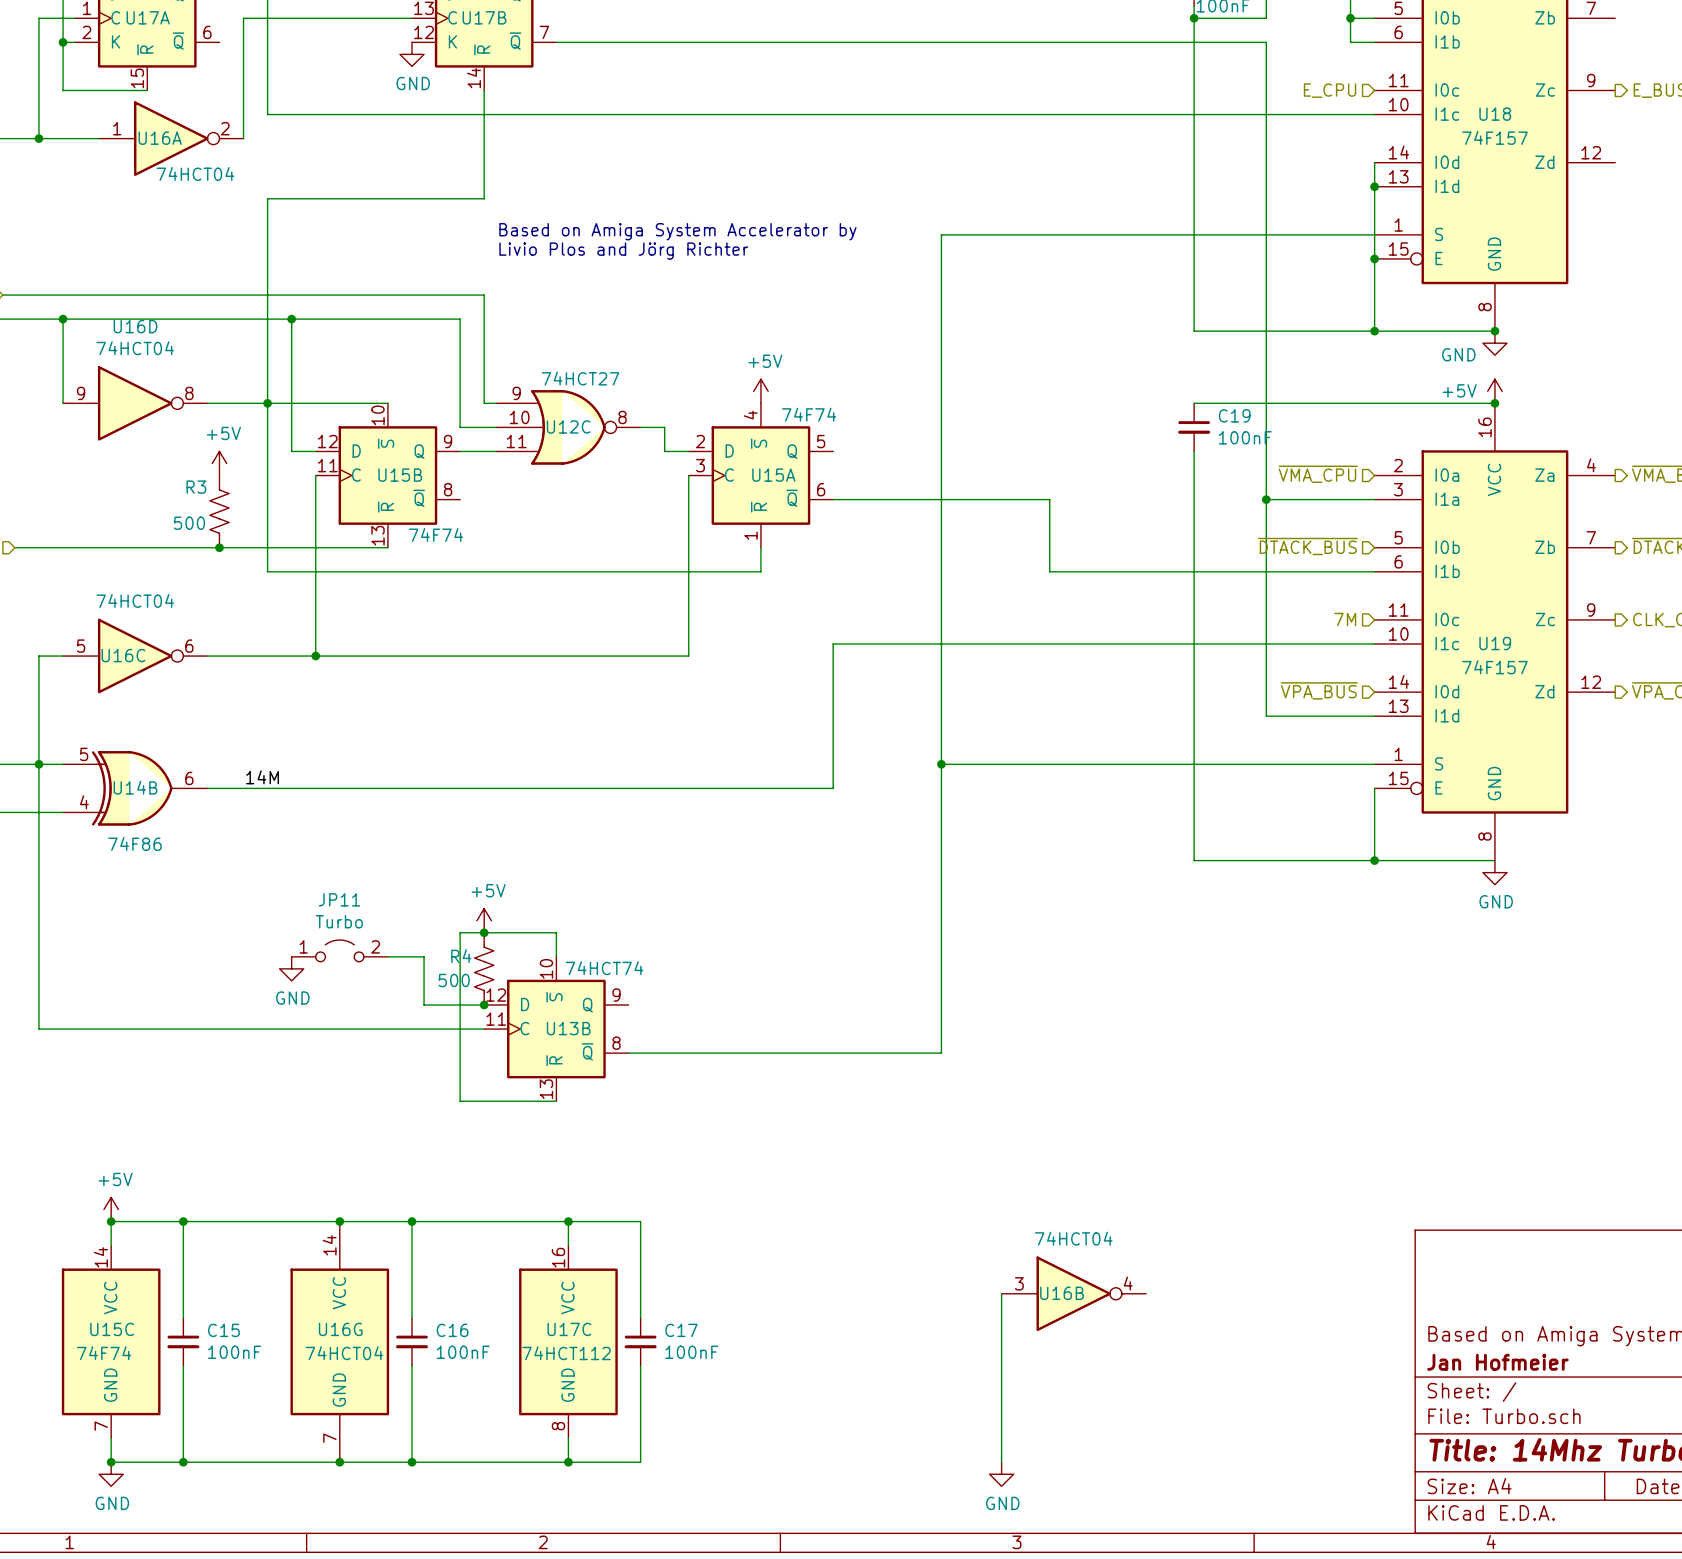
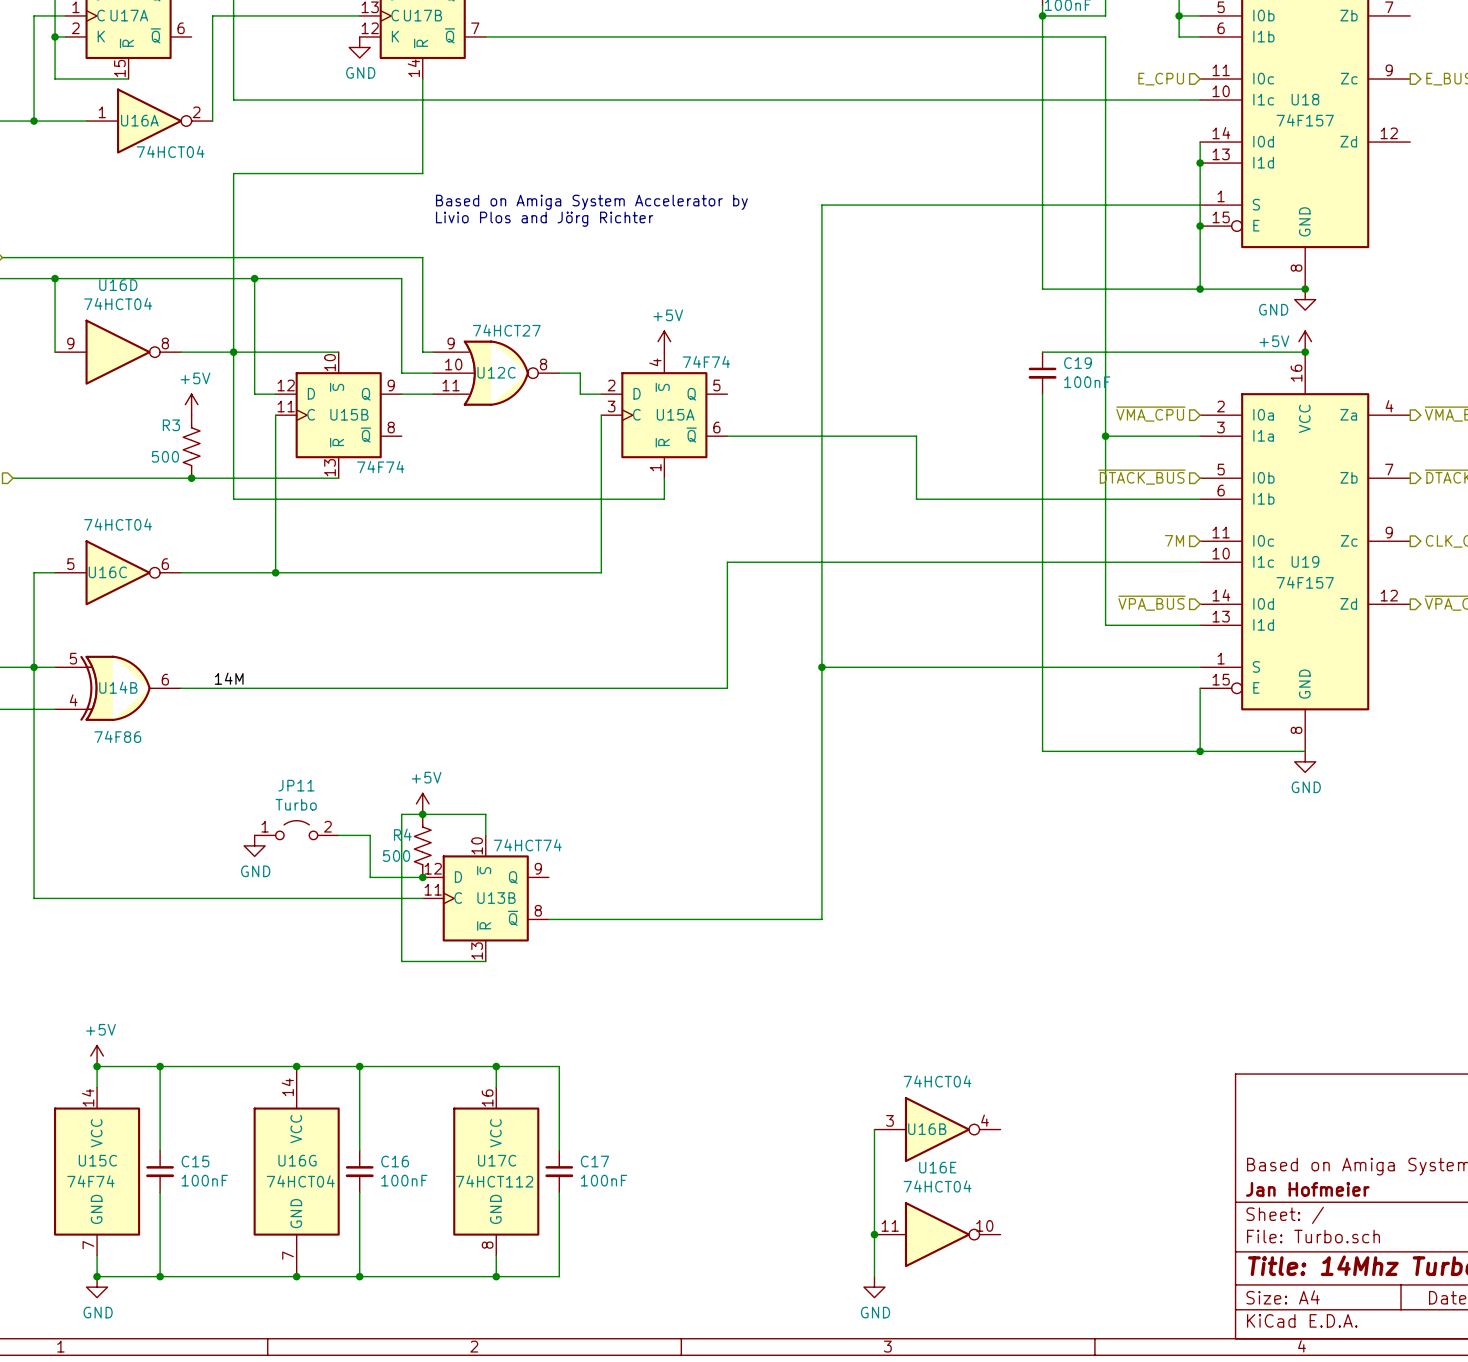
junction: none -> (874, 1234)
U16E: none -> 74HCT04 (937, 1234)

